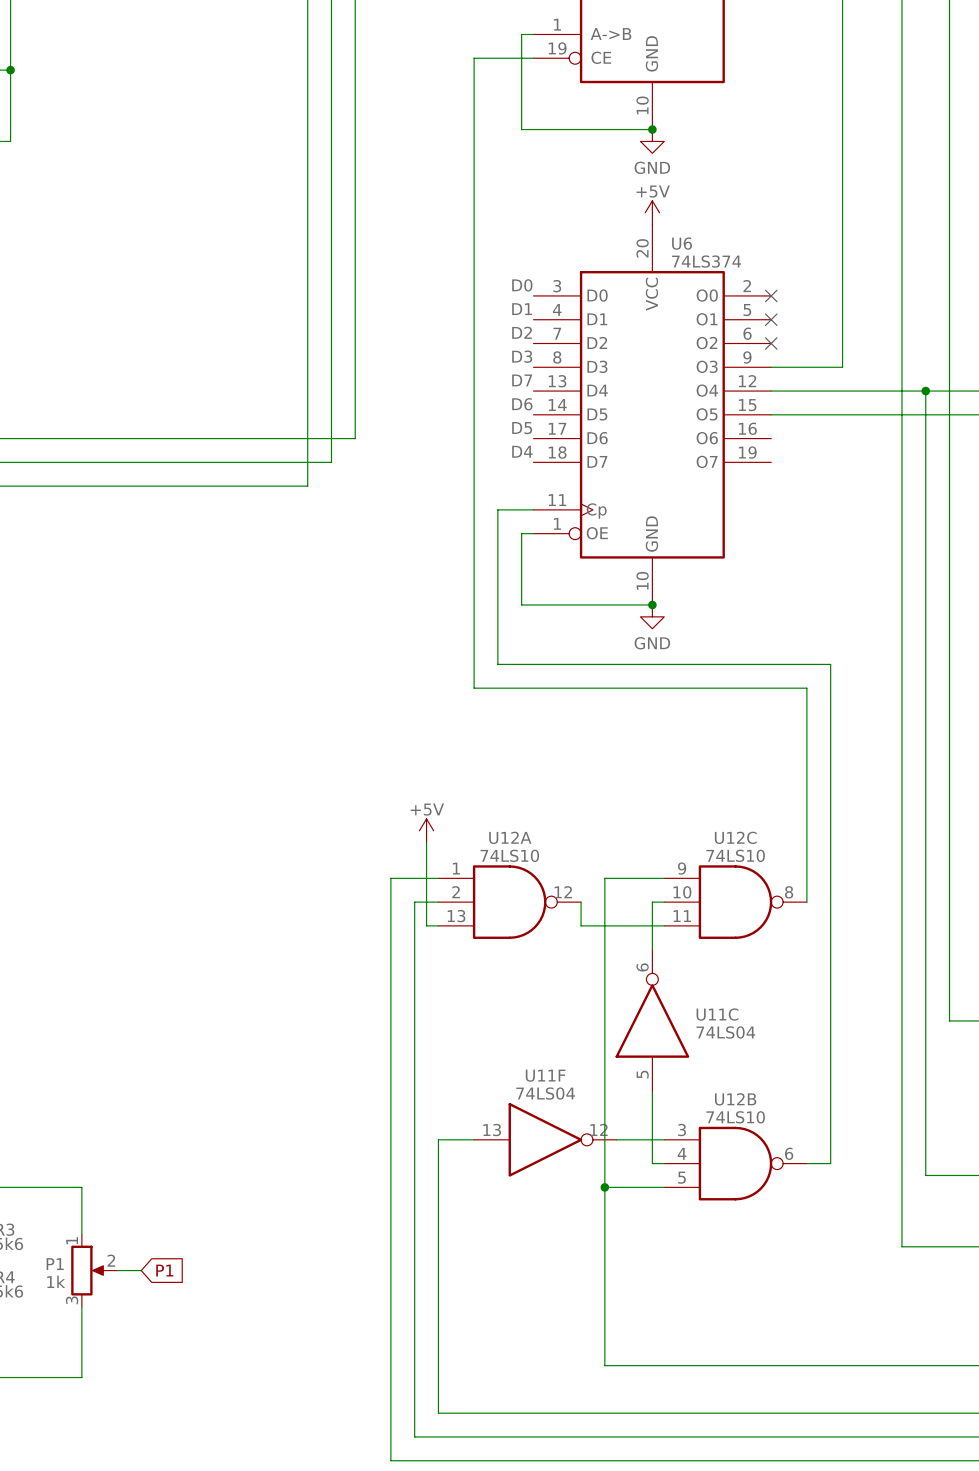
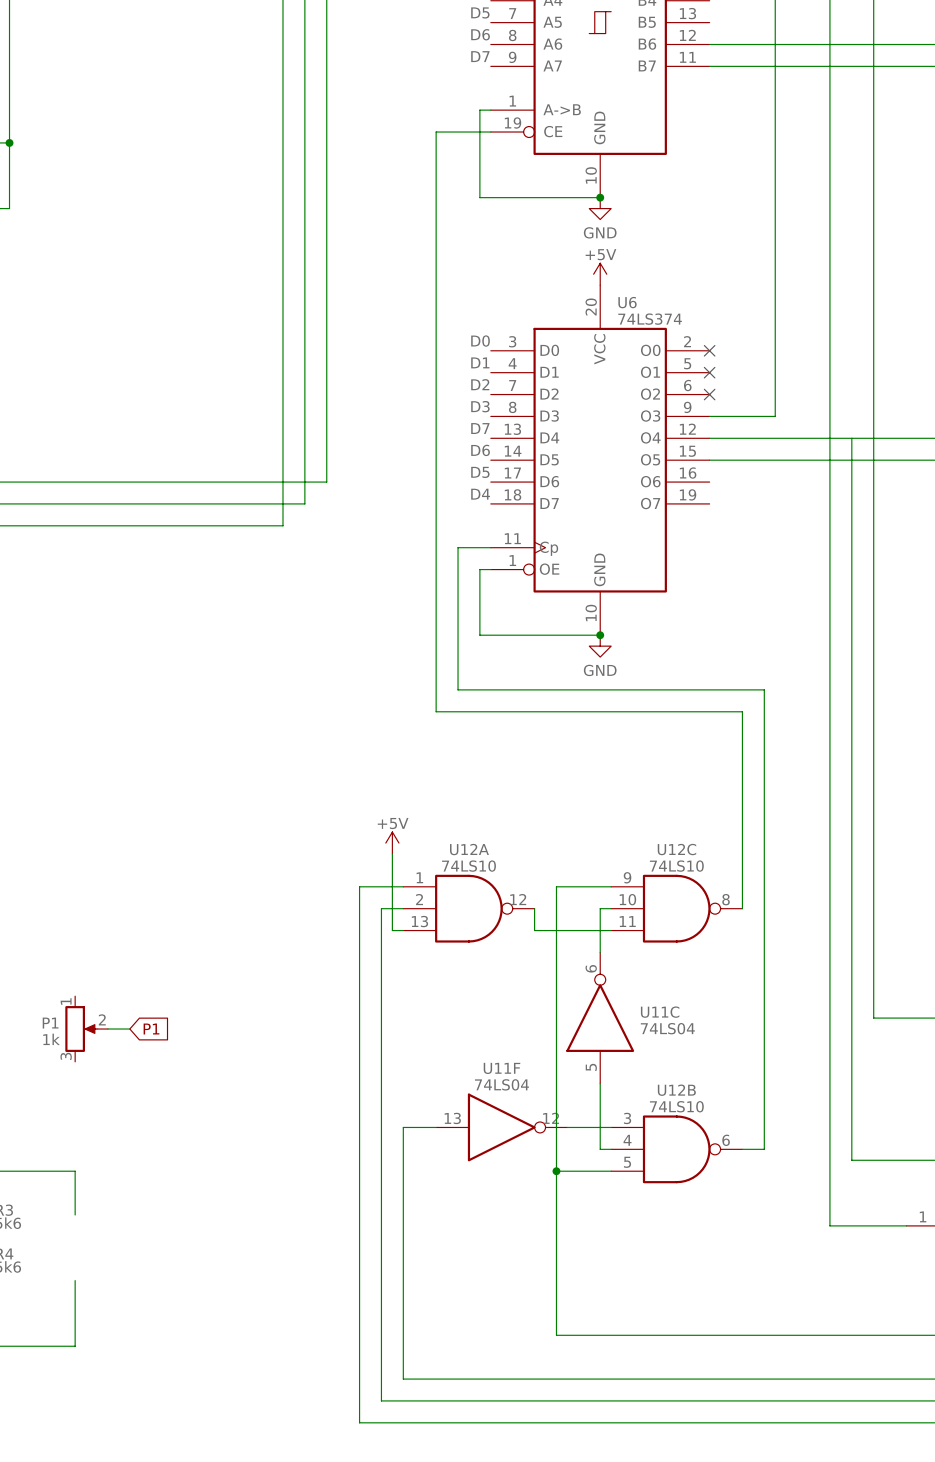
junction: (925, 391) -> none
wire: none -> (107, 1029) (129, 1029)
global label: none -> P1 (151, 1029)
P1 position: (94, 1270) -> (86, 1029)
wire: (117, 1270) (141, 1270) -> none
global label: P1 (164, 1270) -> none

